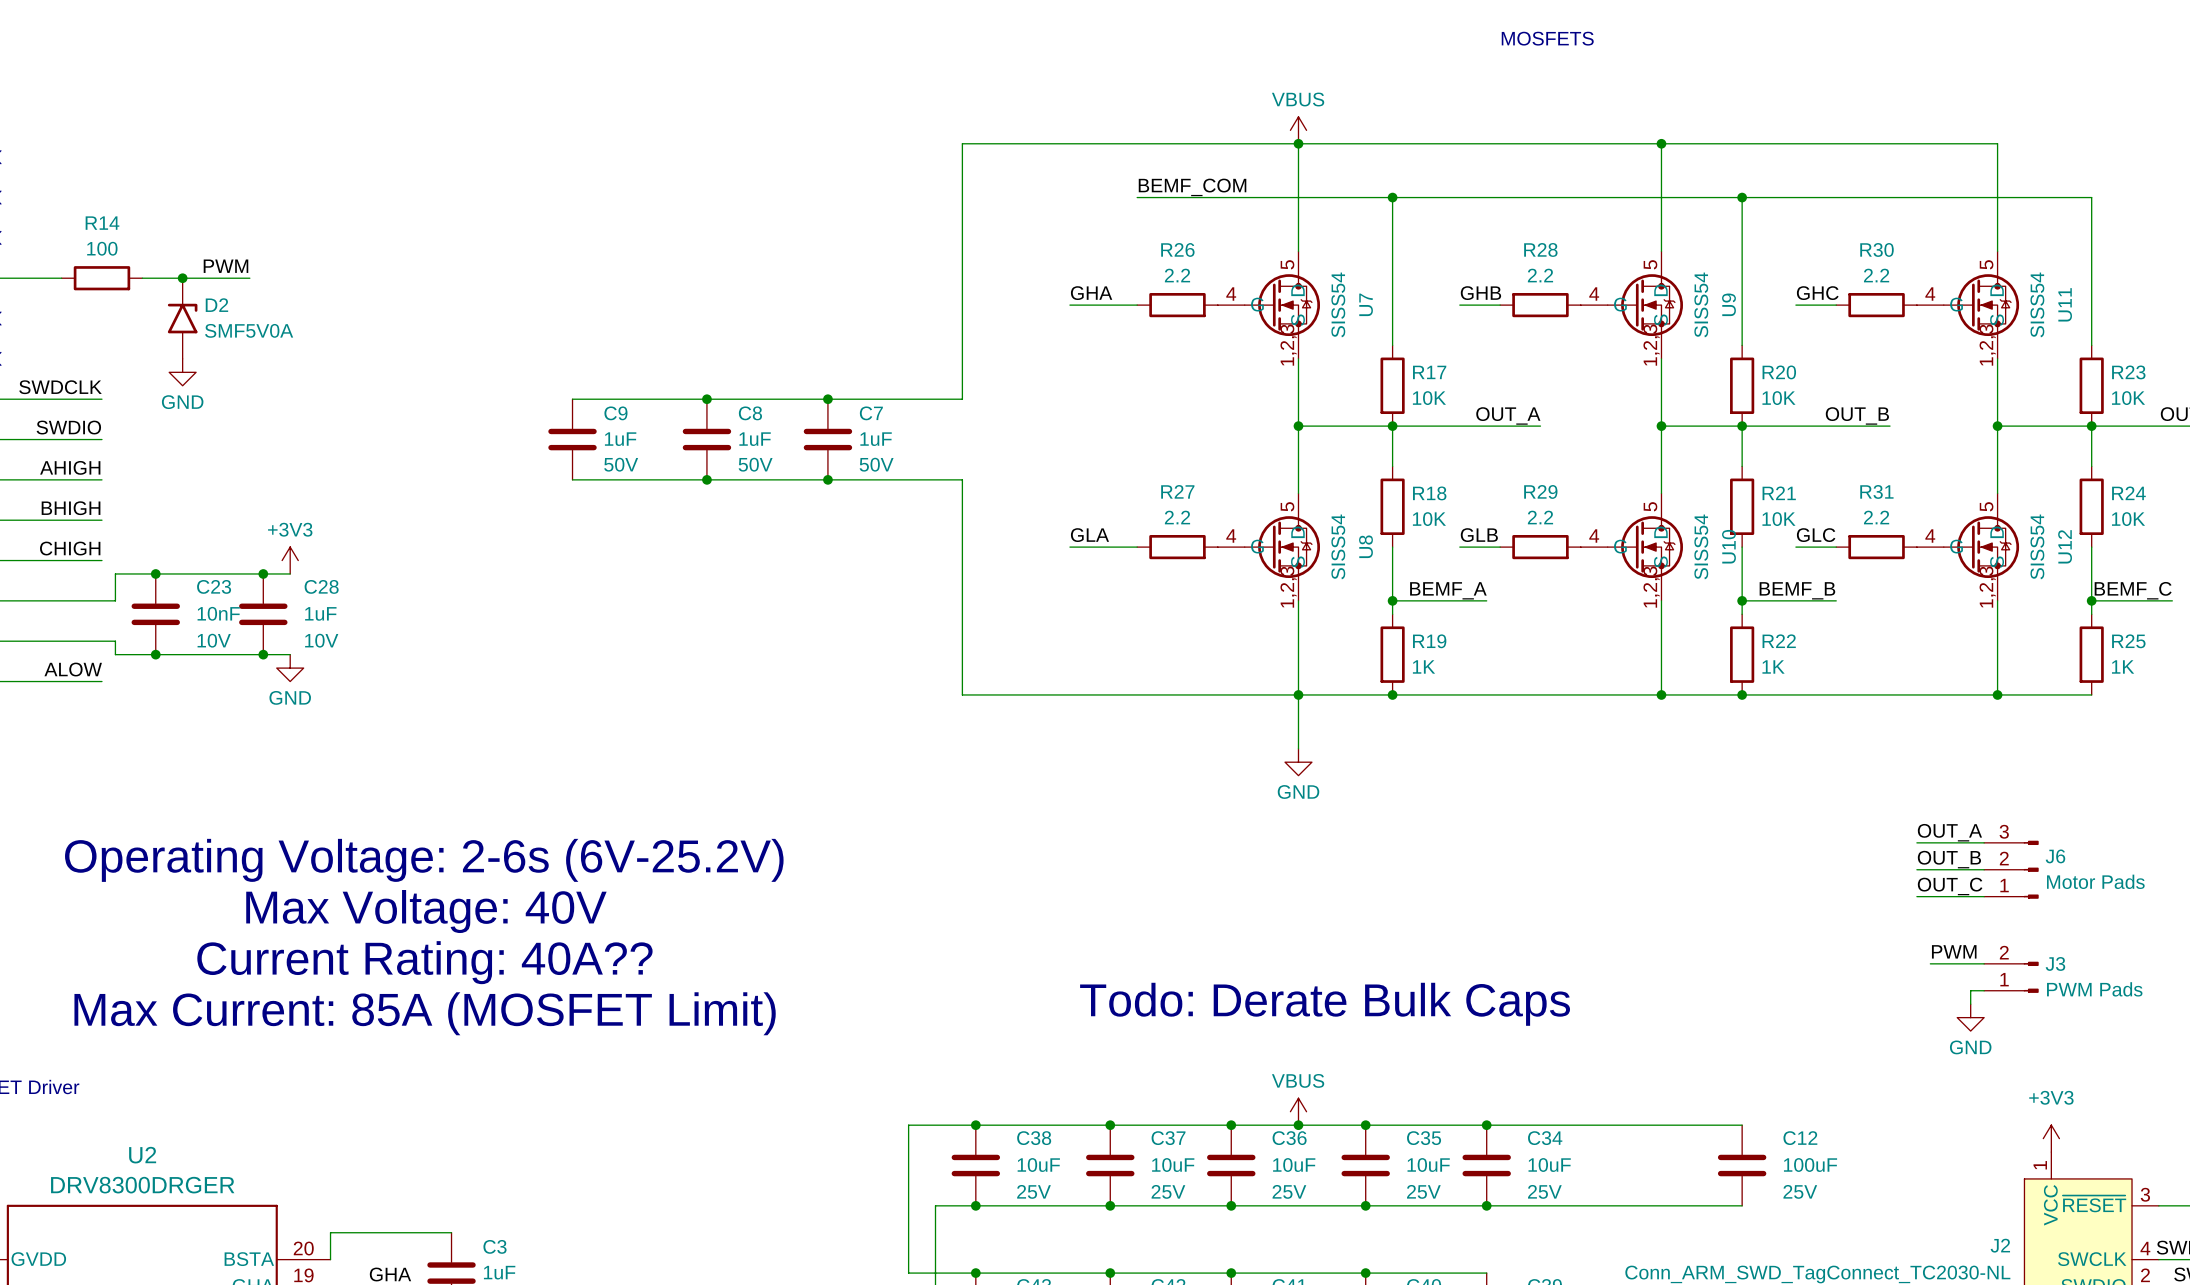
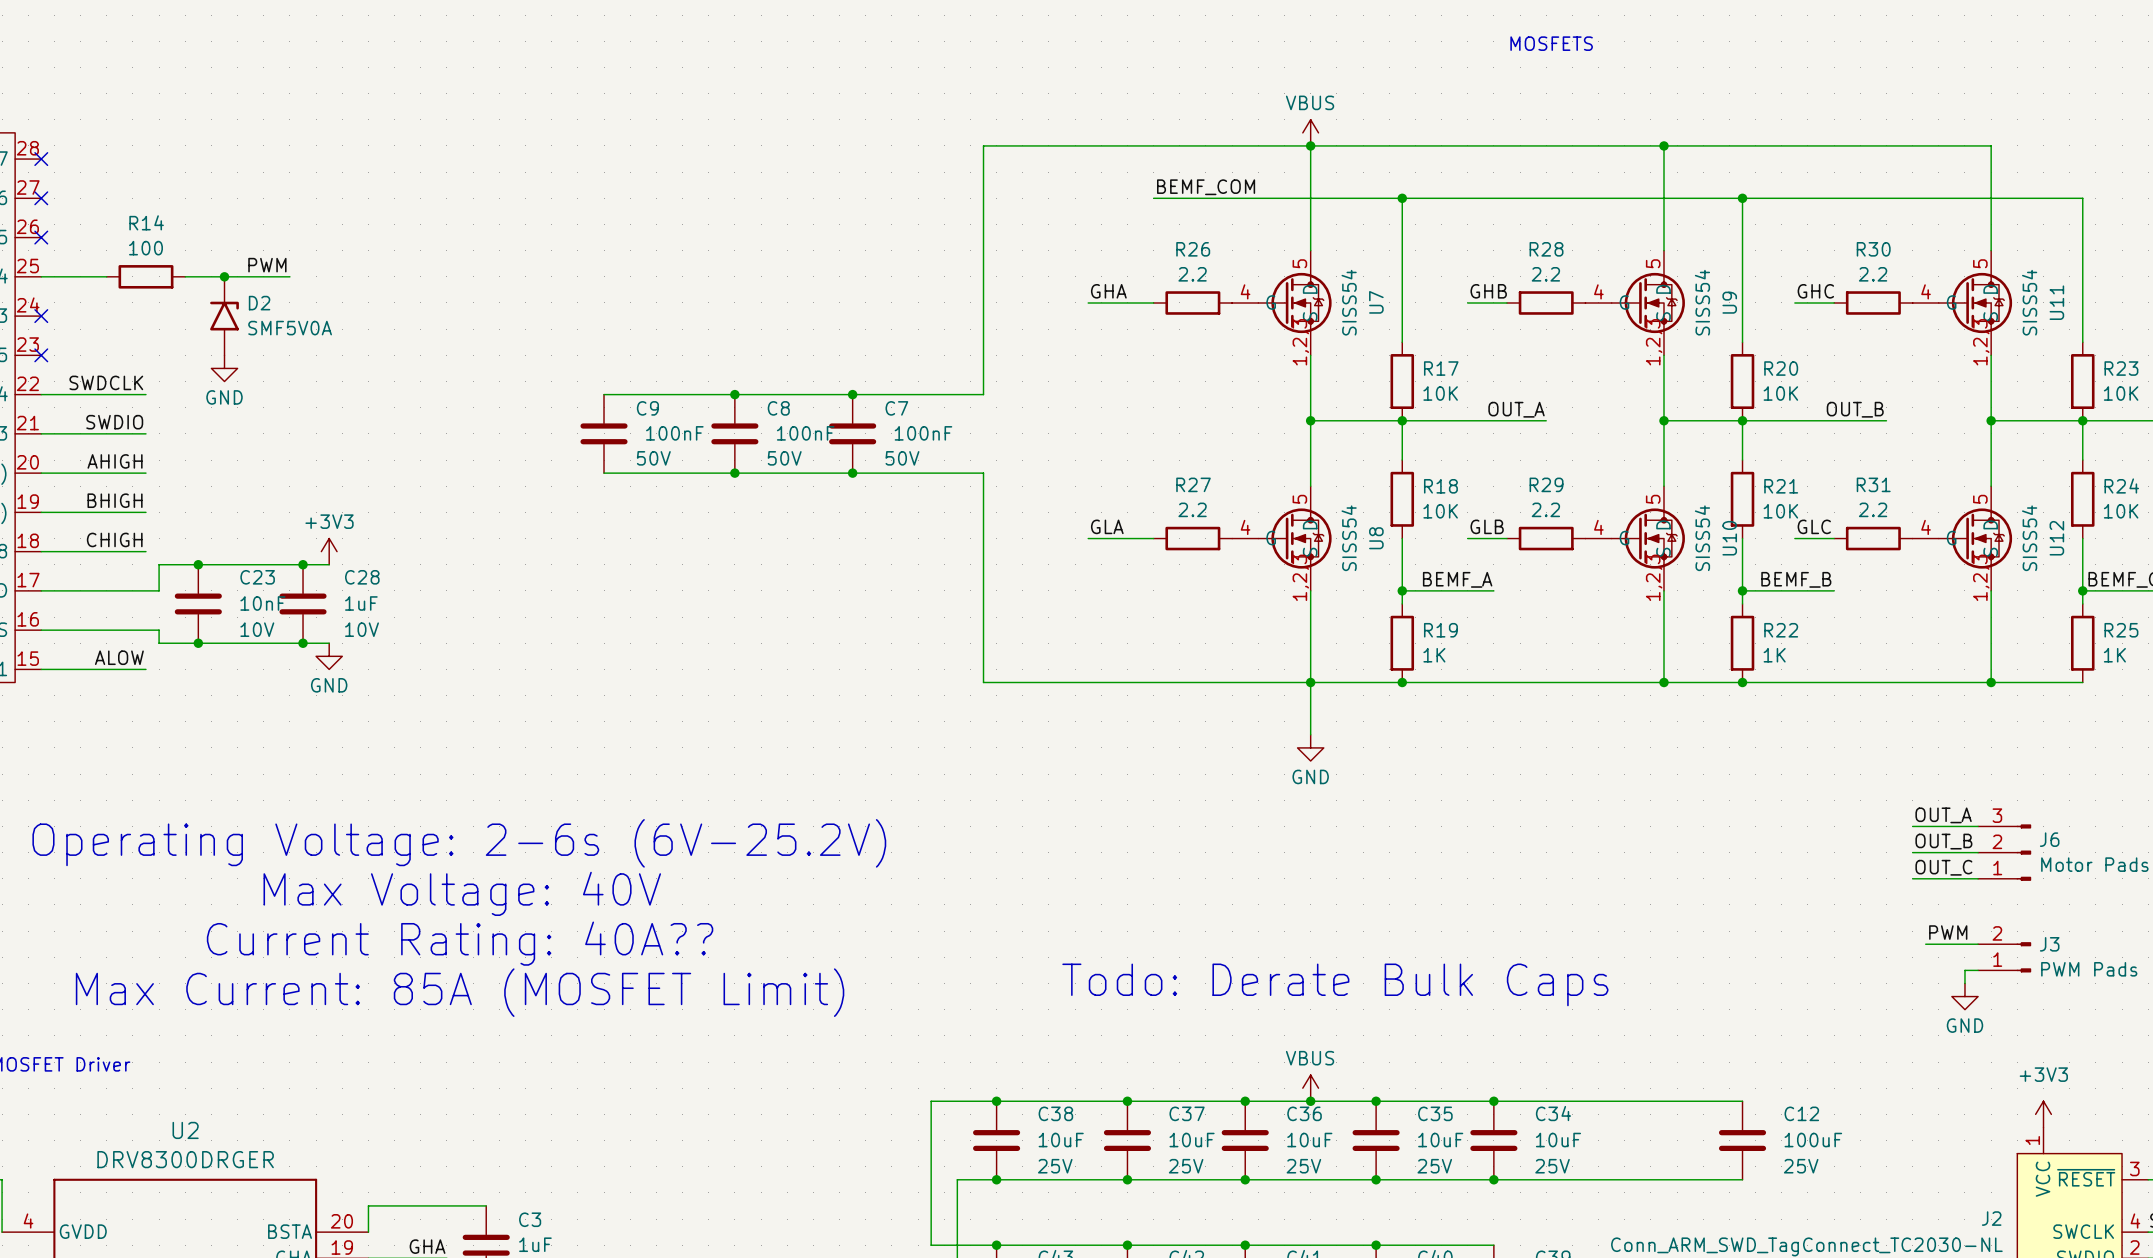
C9 value: 1uF (620, 439) -> 100nF (674, 433)
C8 value: 1uF (755, 439) -> 100nF (805, 433)
C7 value: 1uF (876, 439) -> 100nF (923, 433)

